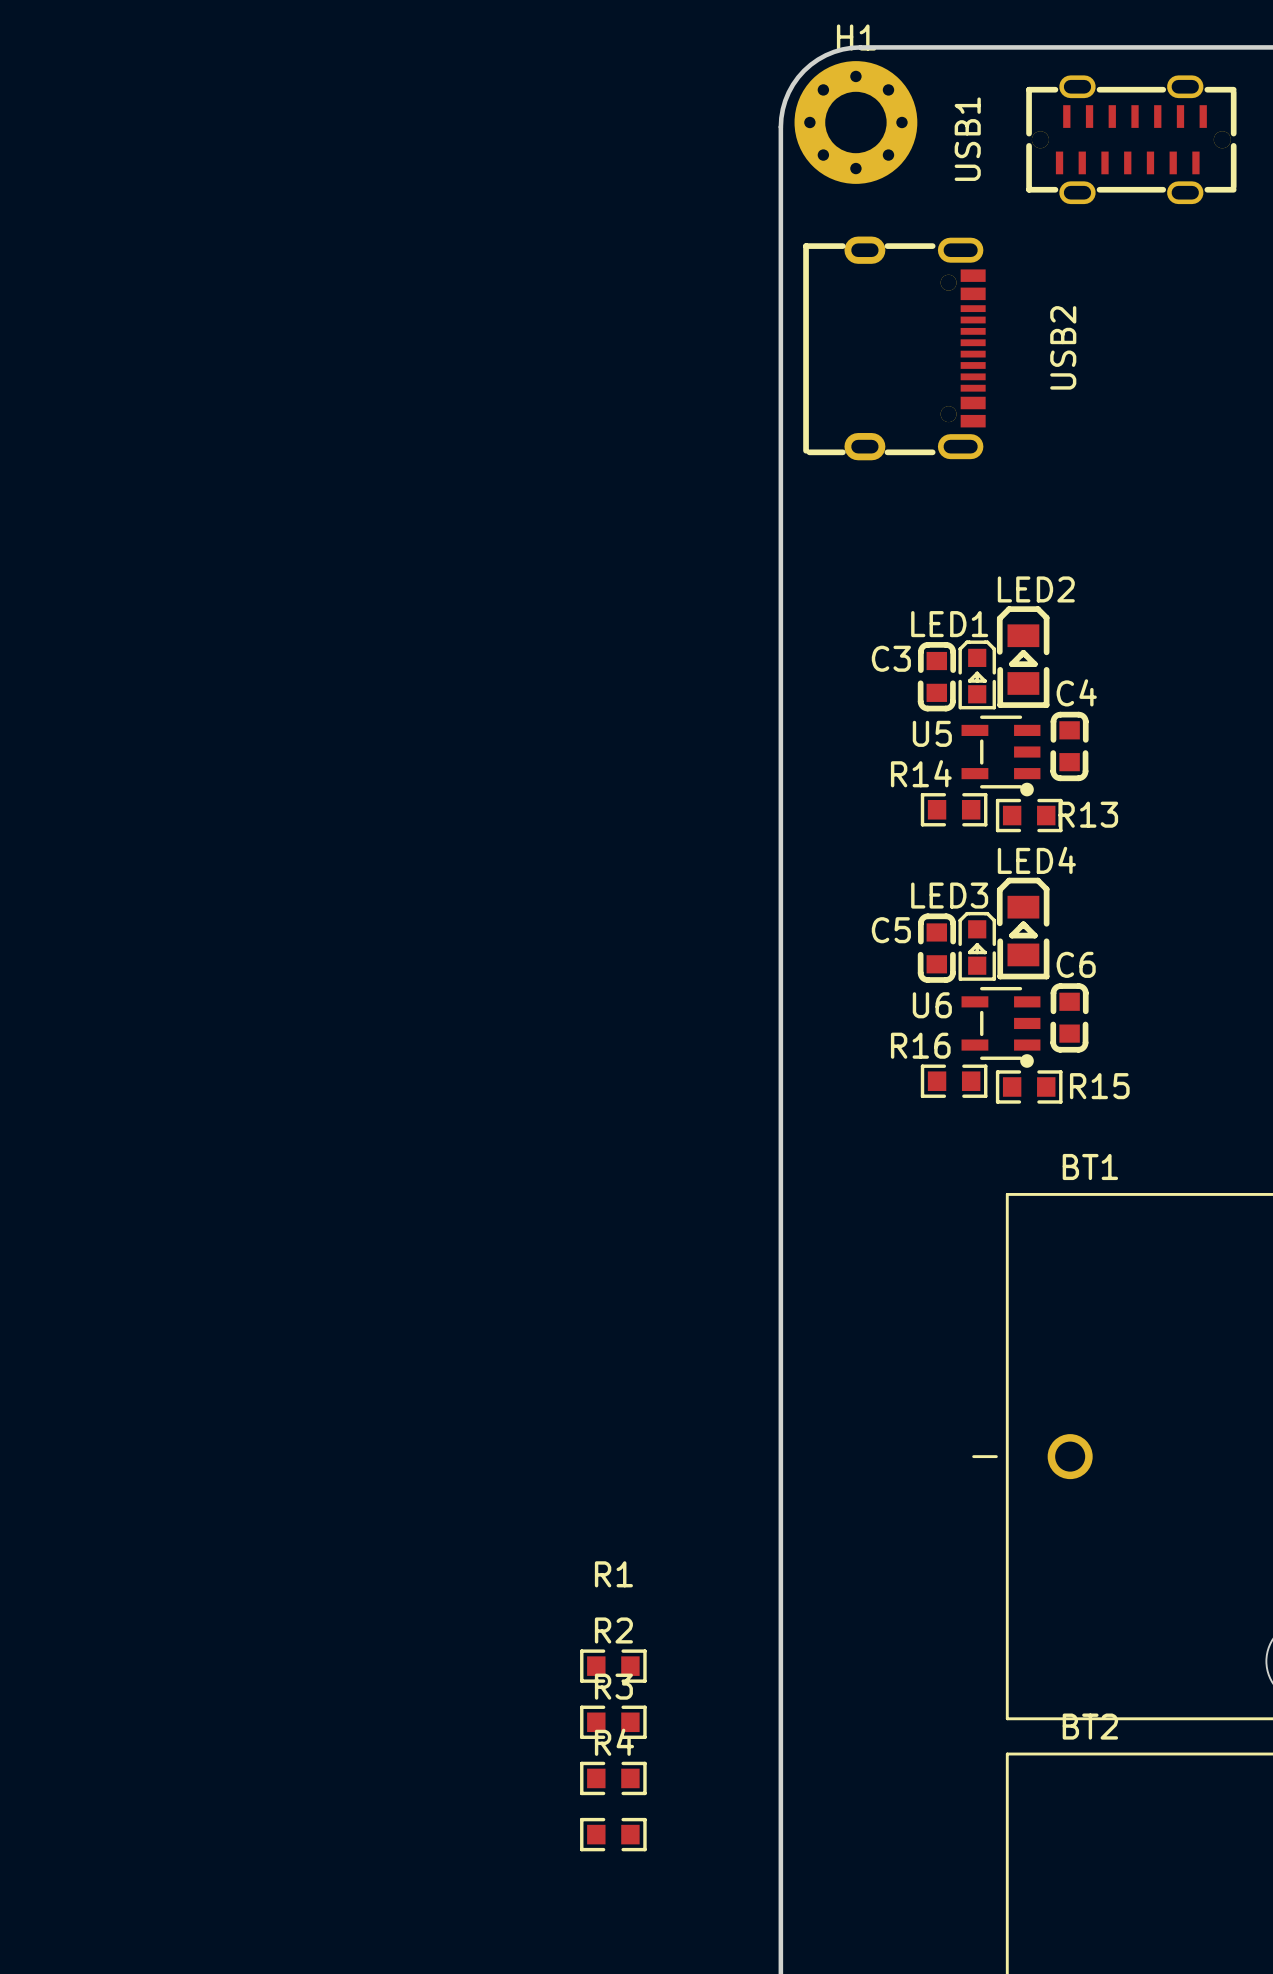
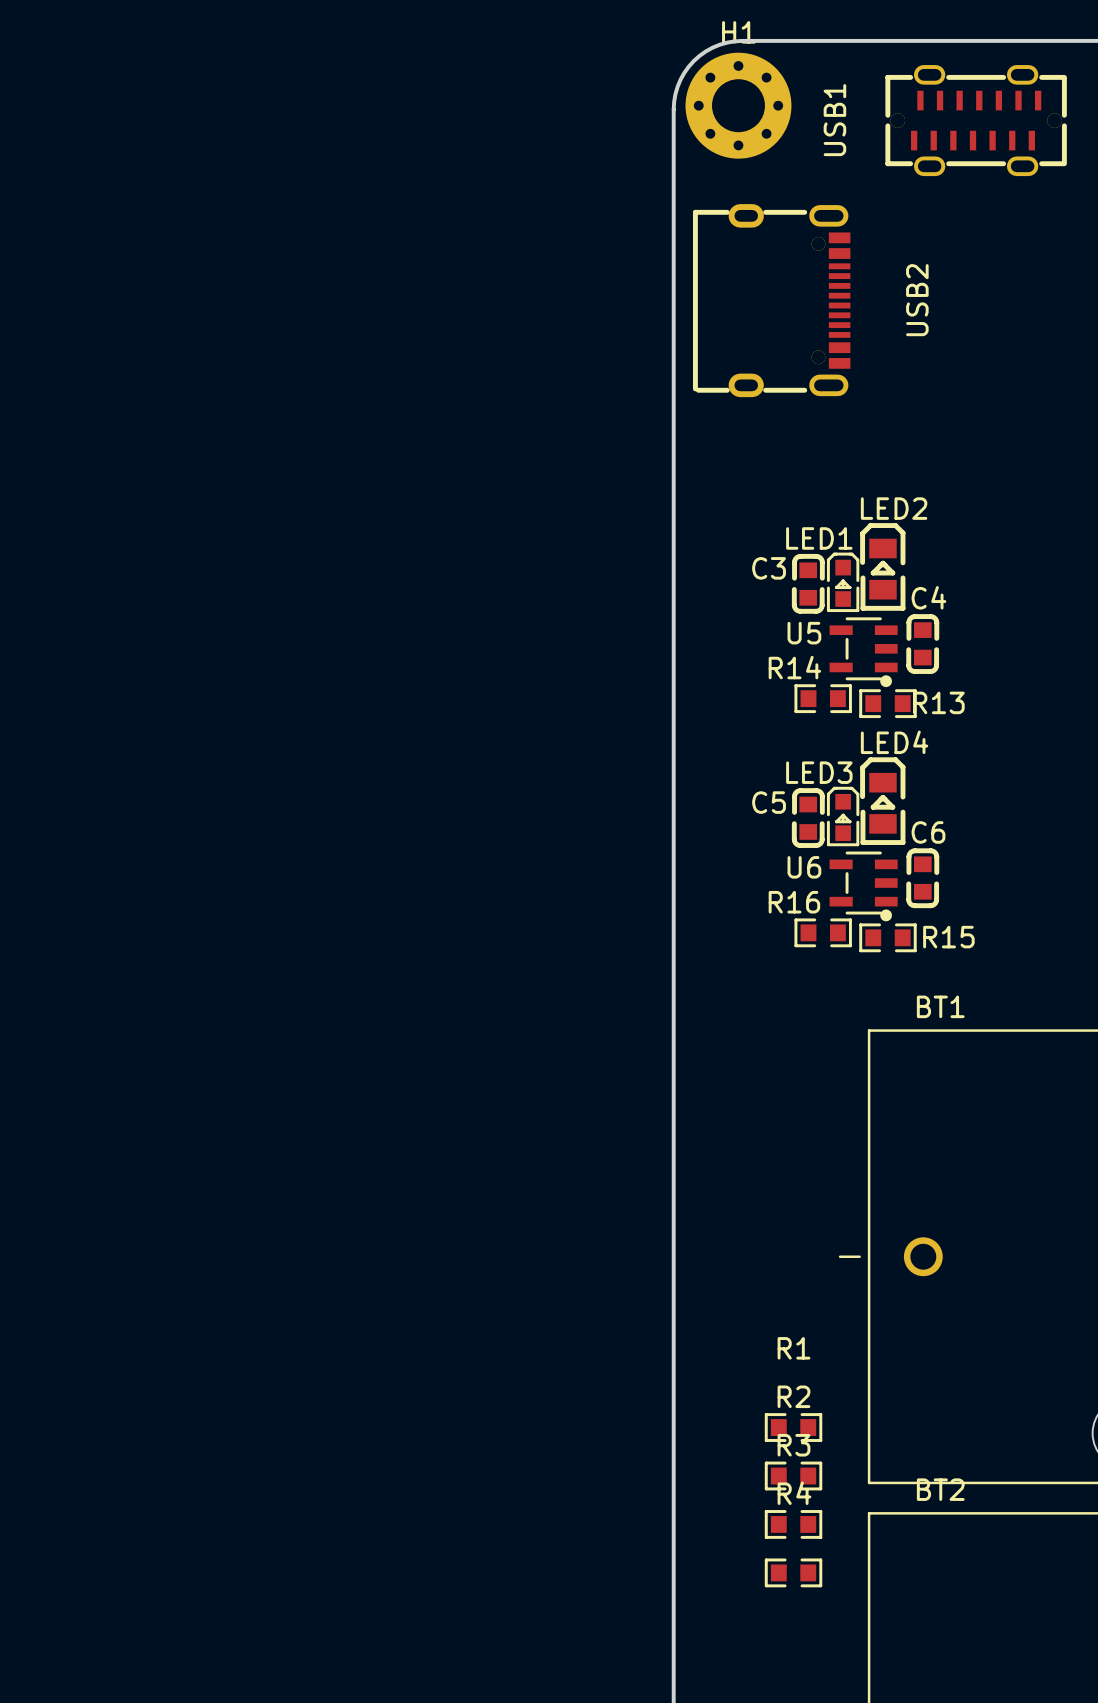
R1 position: (613, 1666) -> (793, 1427)
R2 position: (613, 1722) -> (793, 1475)
R3 position: (613, 1778) -> (793, 1524)
R4 position: (613, 1834) -> (793, 1572)

